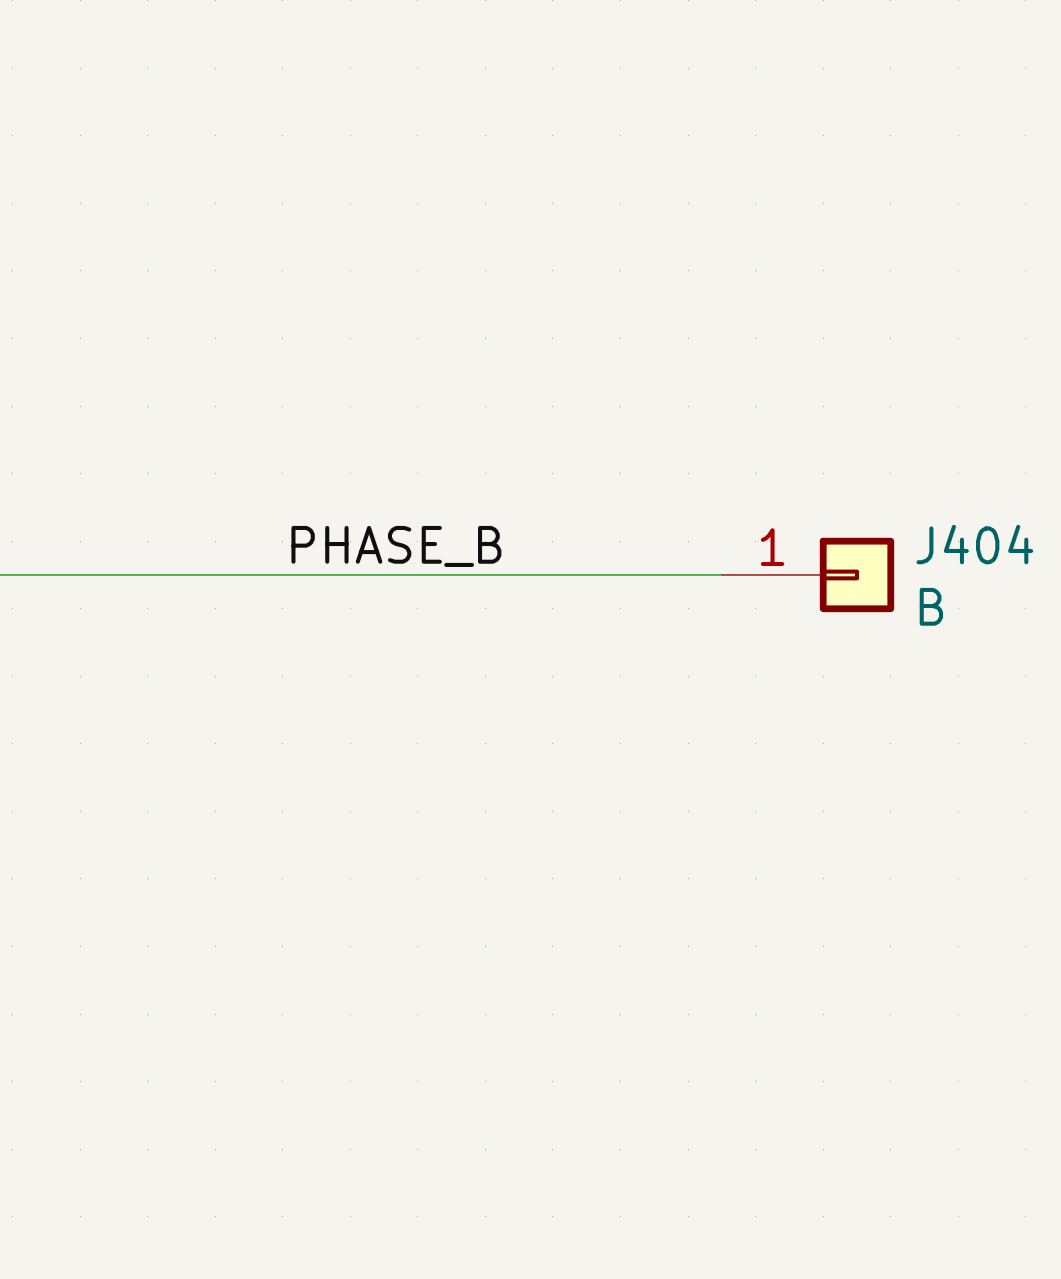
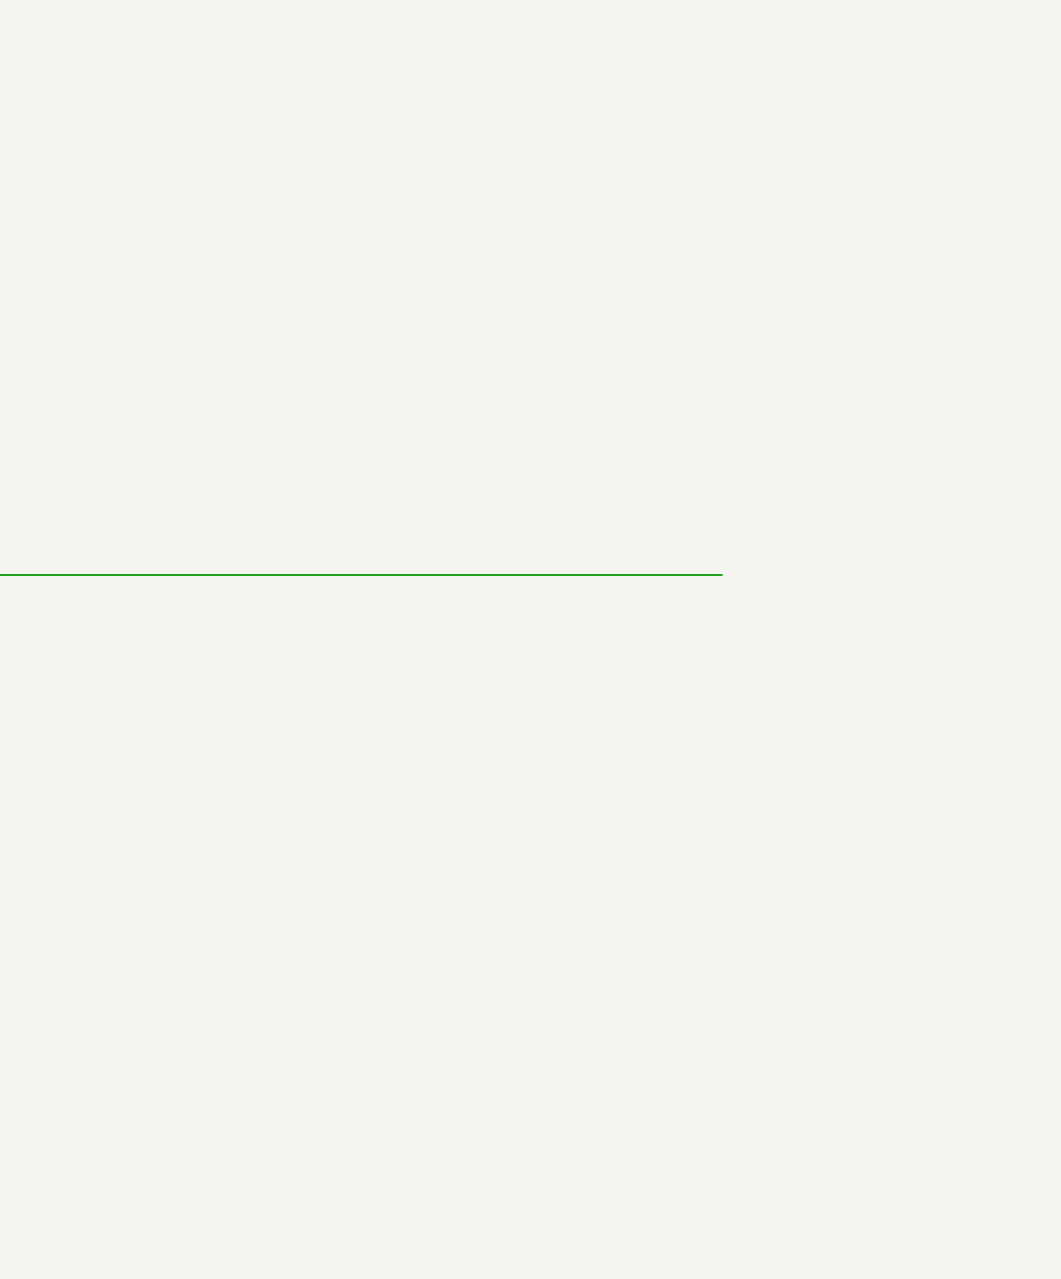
label: PHASE_B (396, 546) -> none
J404: B (808, 574) -> none

